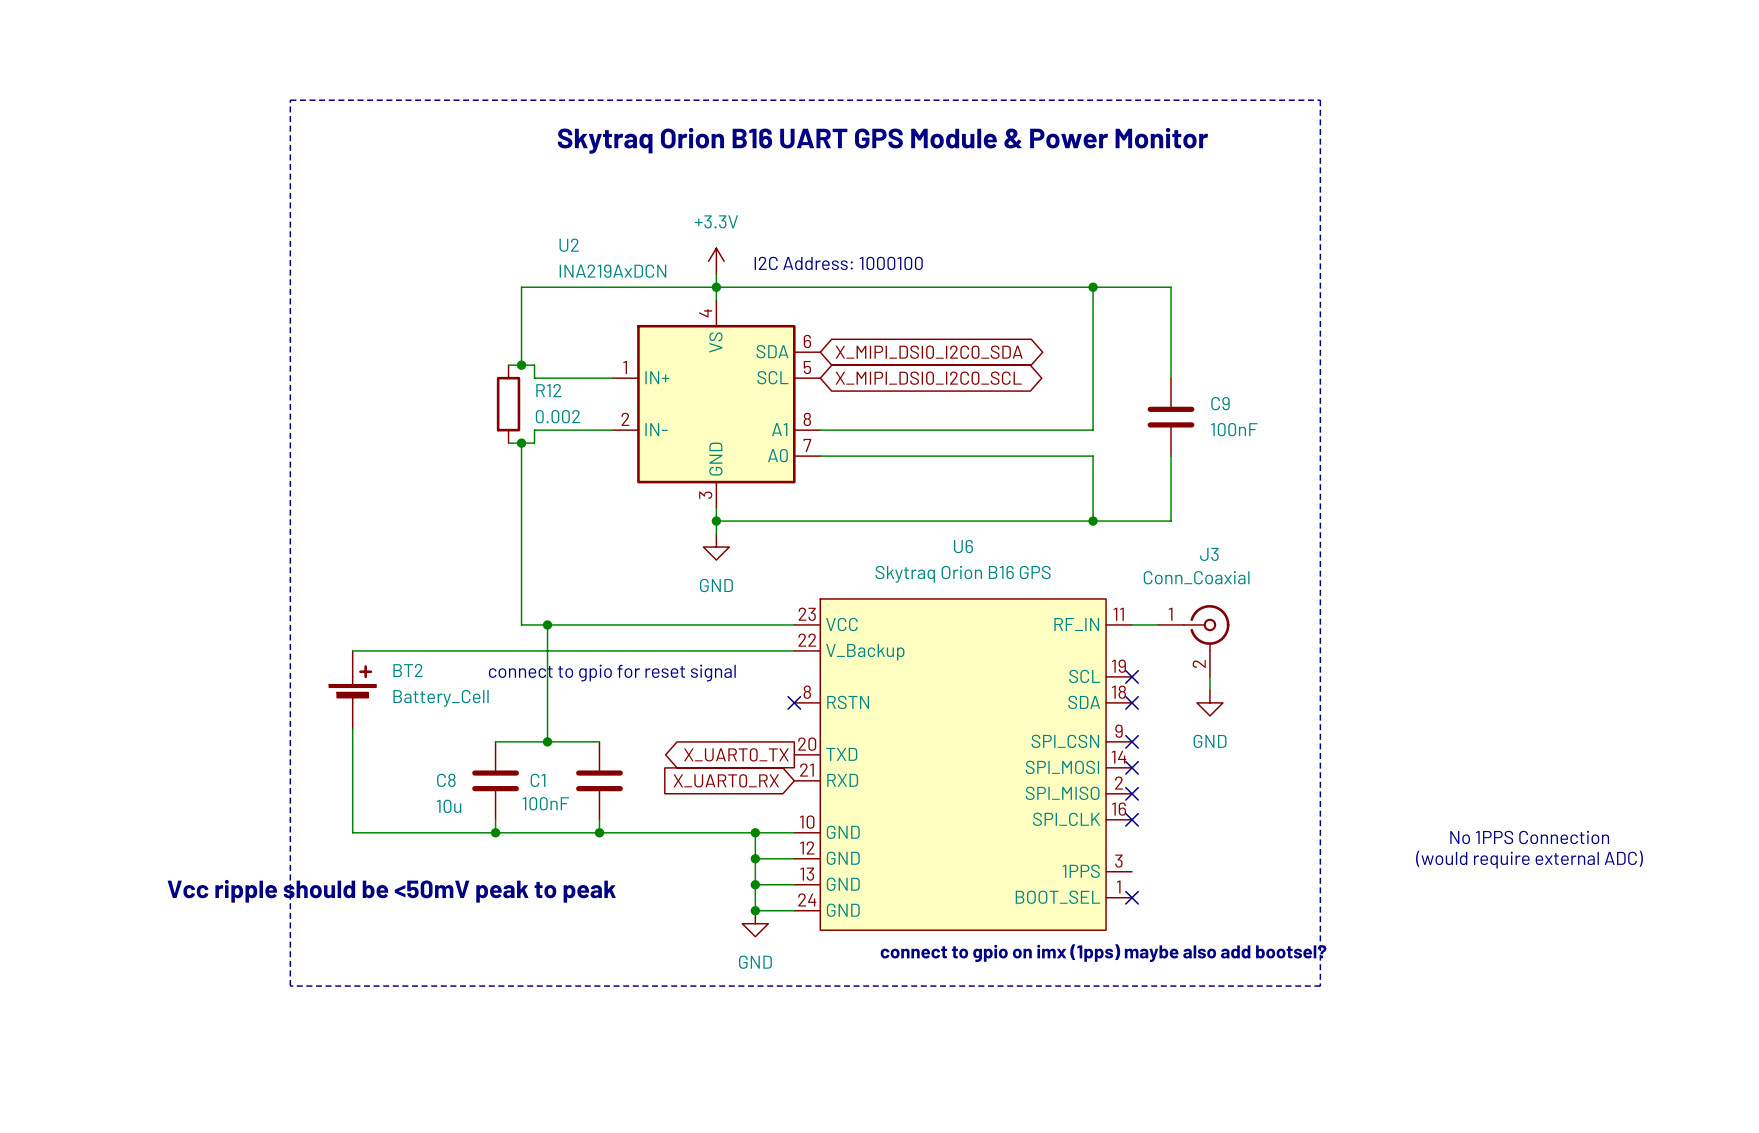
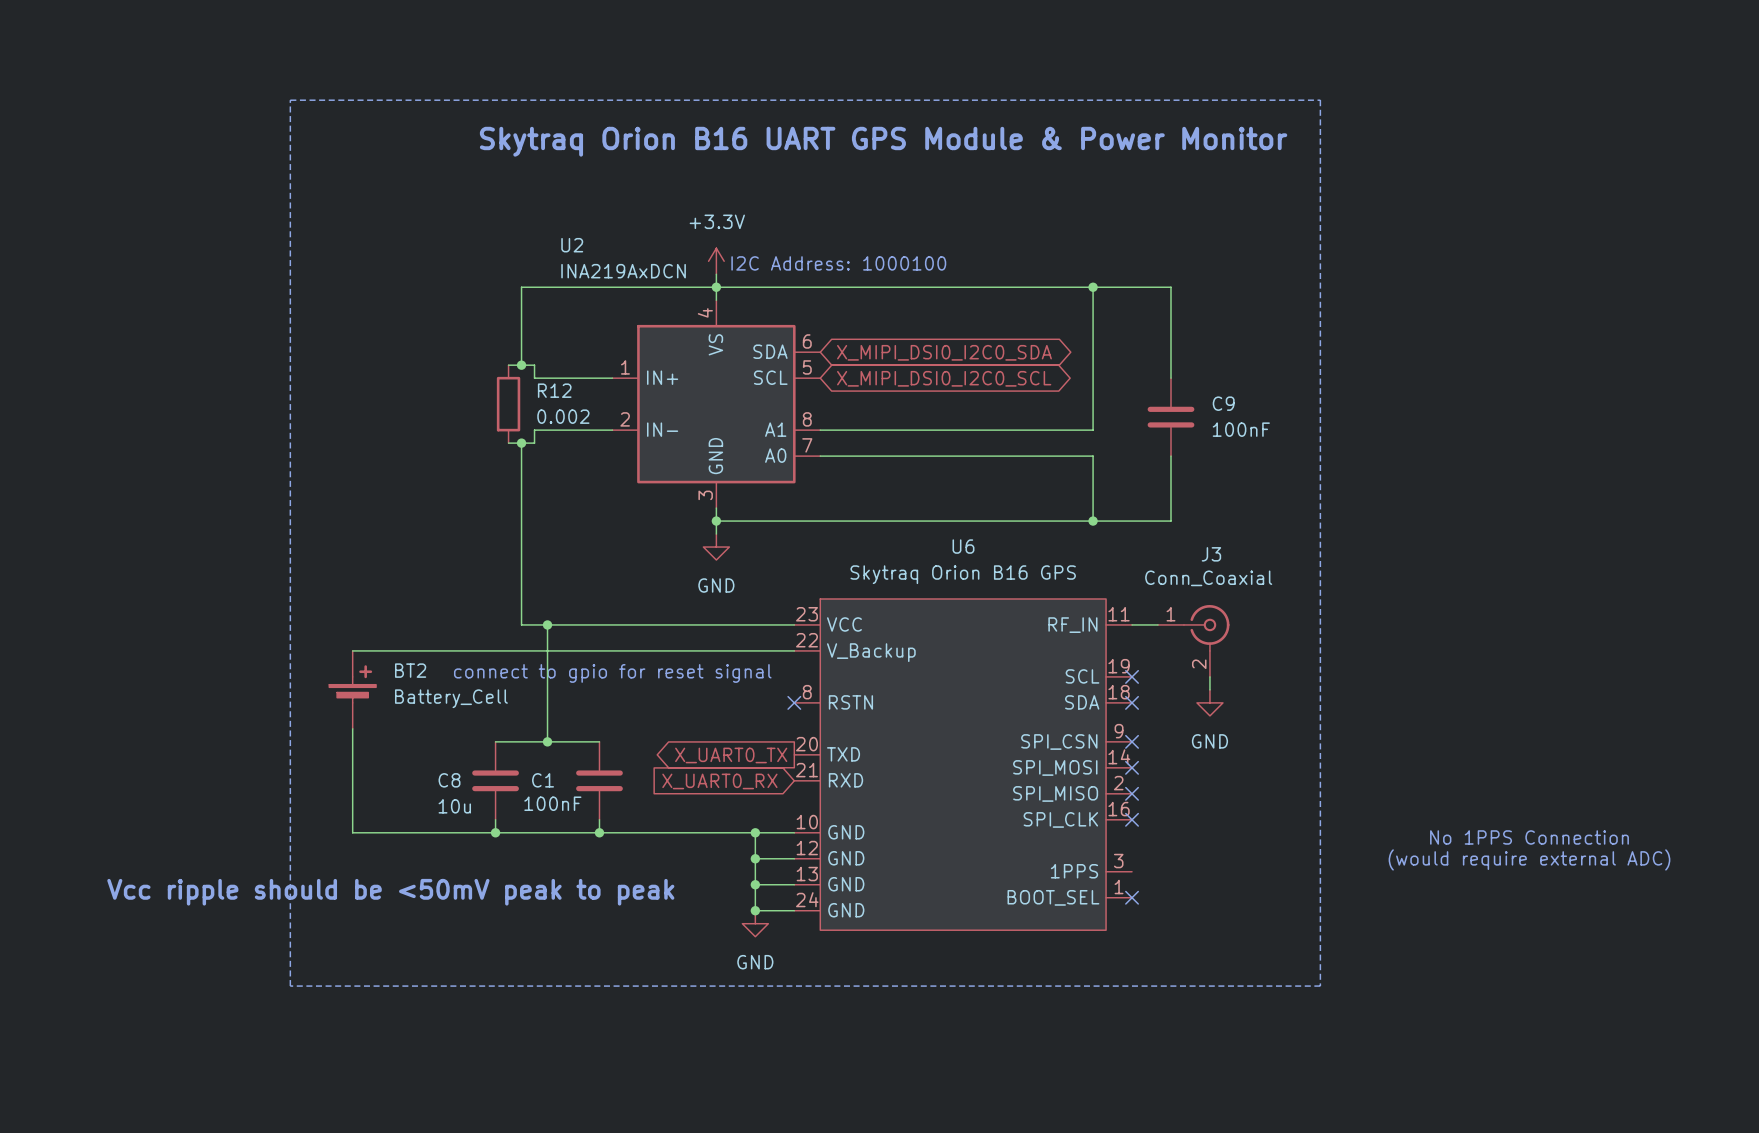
text: connect to gpio on imx (1pps) maybe also add bootsel? (1103, 953) -> none

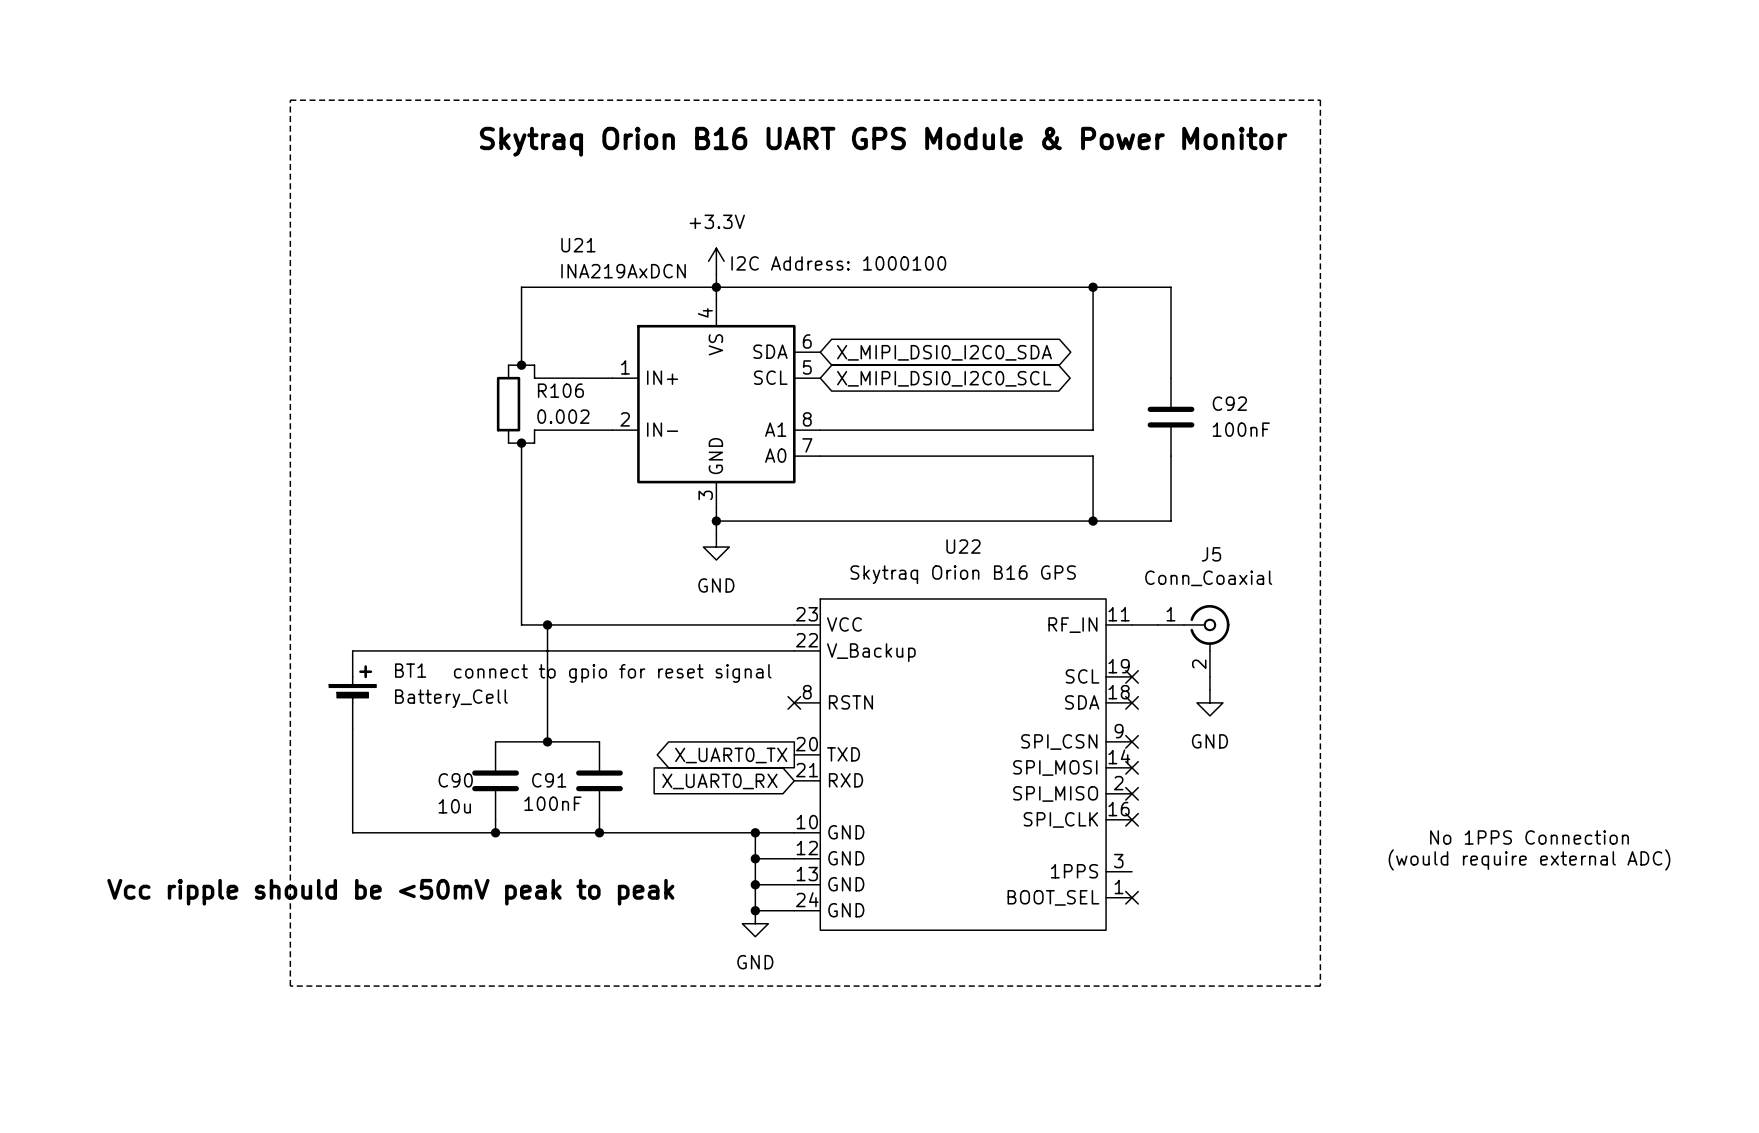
U2 name: U2 (572, 245) -> U21 (578, 245)
R12 name: R12 (554, 390) -> R106 (560, 390)
C9 name: C9 (1223, 403) -> C92 (1229, 403)
U6 name: U6 (963, 546) -> U22 (963, 546)
J3 name: J3 (1211, 554) -> J5 (1211, 554)
BT2 name: BT2 (410, 670) -> BT1 (410, 670)
C8 name: C8 (449, 780) -> C90 (455, 780)
C1 name: C1 (543, 780) -> C91 (549, 780)

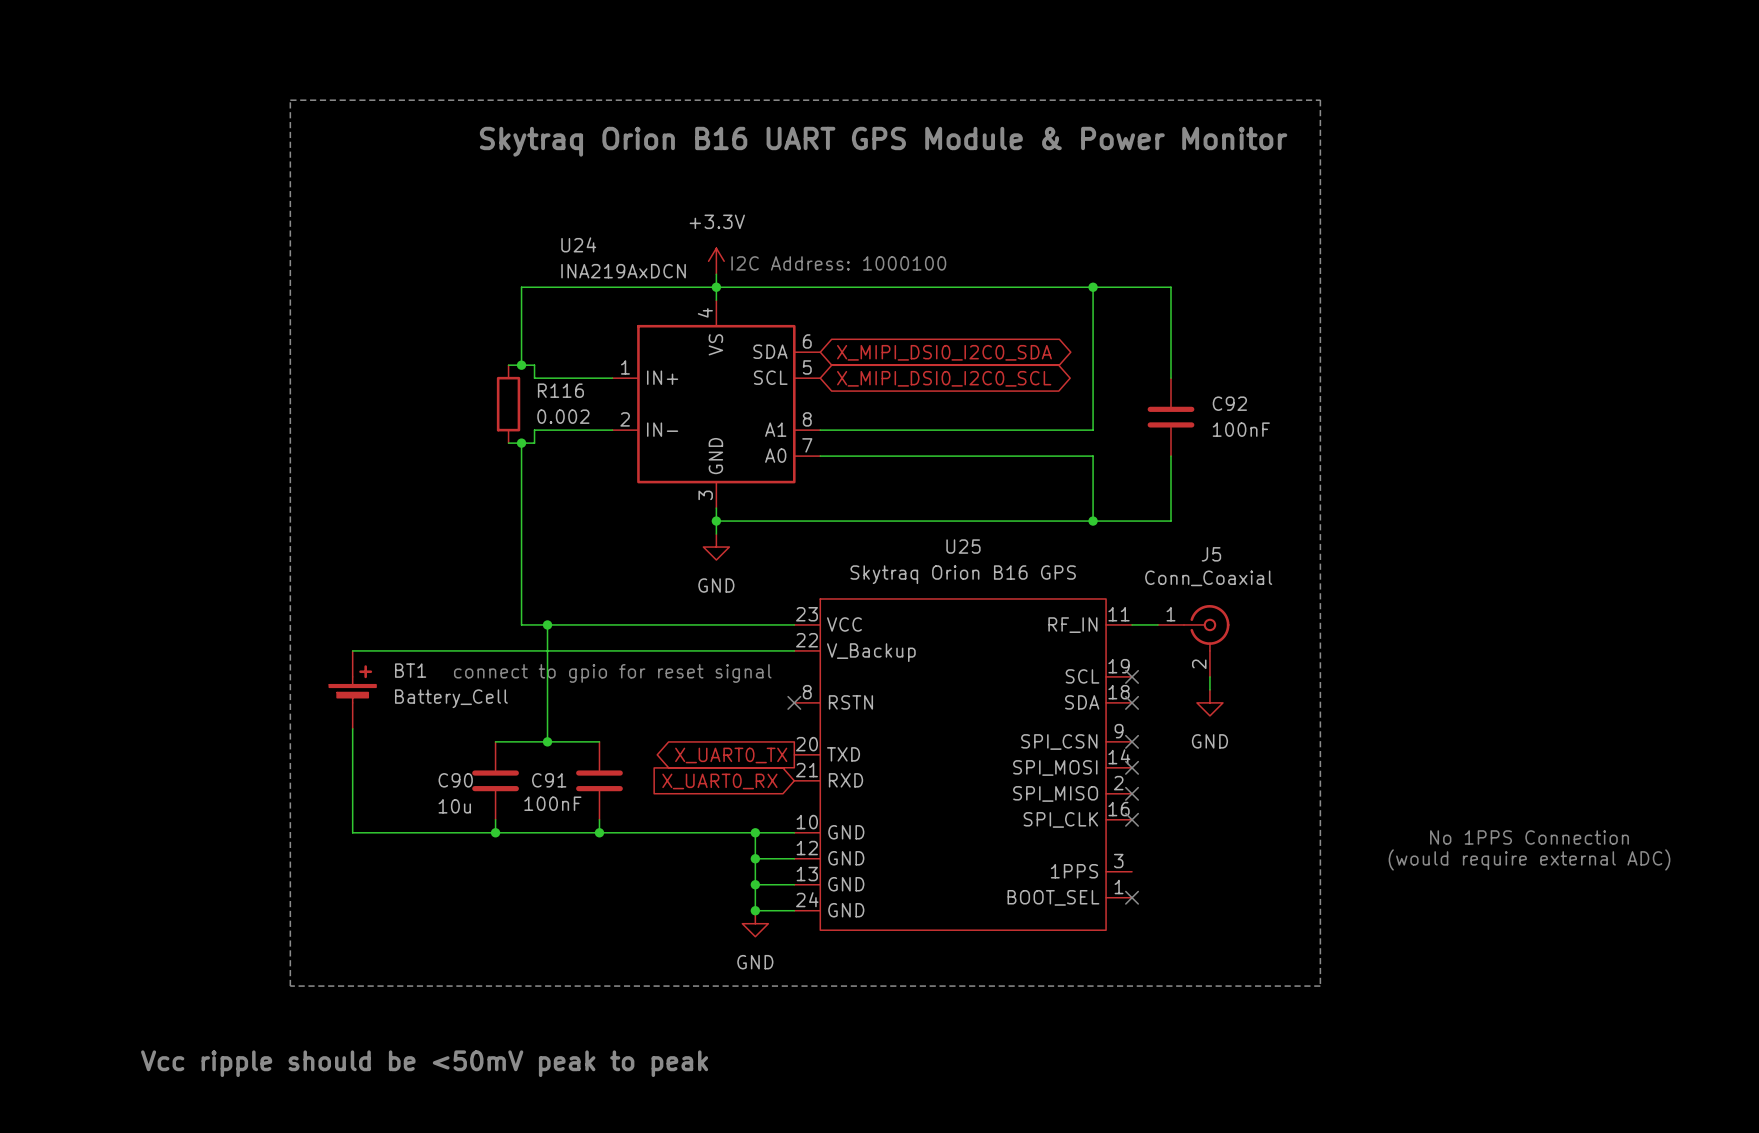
U21 name: U21 (578, 245) -> U24 (578, 244)
R106 name: R106 (560, 390) -> R116 (560, 390)
U22 name: U22 (963, 546) -> U25 (963, 546)
text position: Vcc ripple should be <50mV peak to peak (390, 892) -> Vcc ripple should be <50mV peak to peak (424, 1063)

